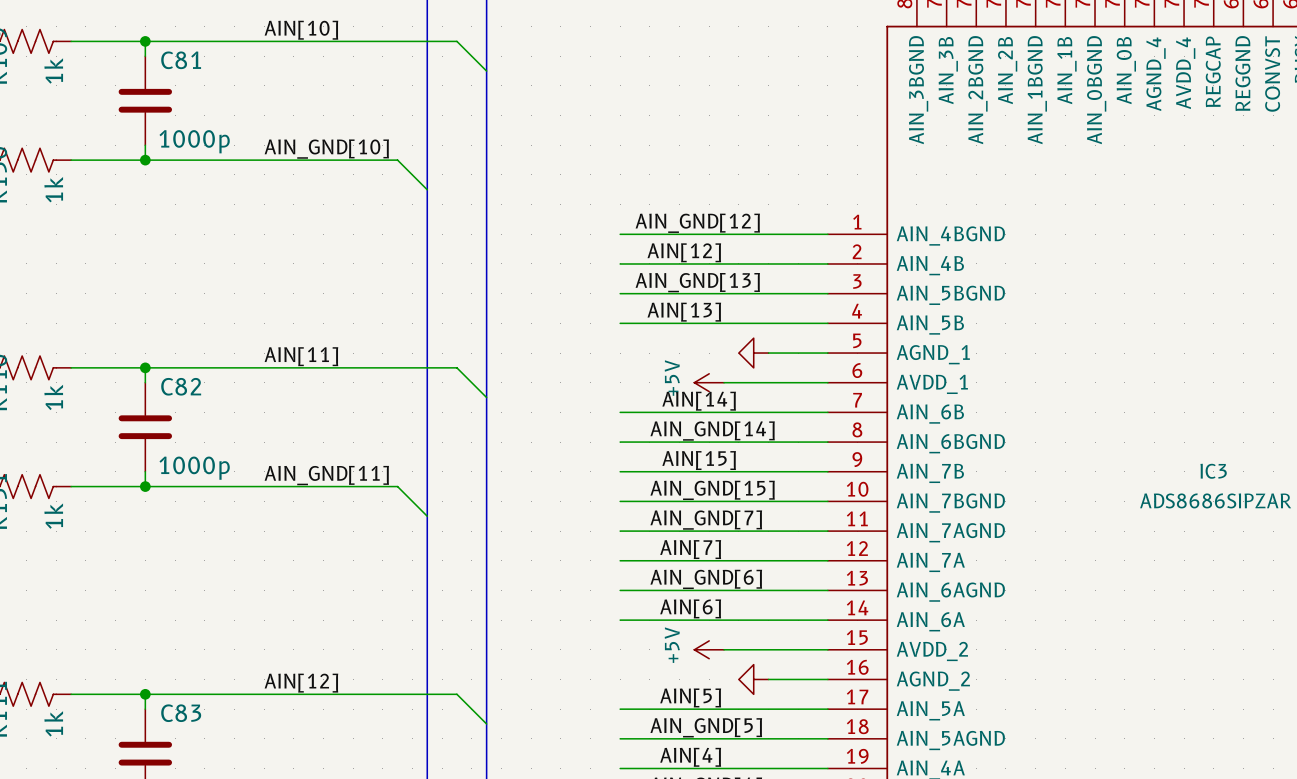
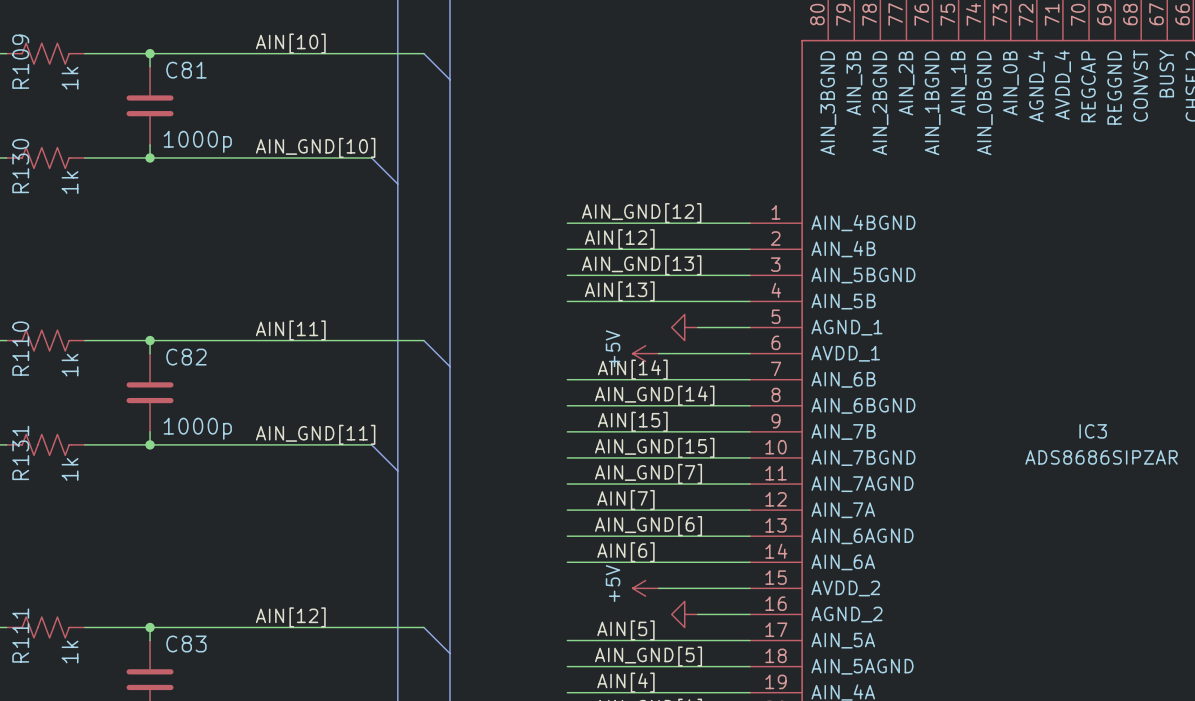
bus: none -> (423, 53) (449, 79)
bus: none -> (371, 157) (397, 184)
bus: none -> (423, 340) (449, 366)
bus: none -> (371, 444) (397, 470)
bus: none -> (423, 627) (449, 653)

